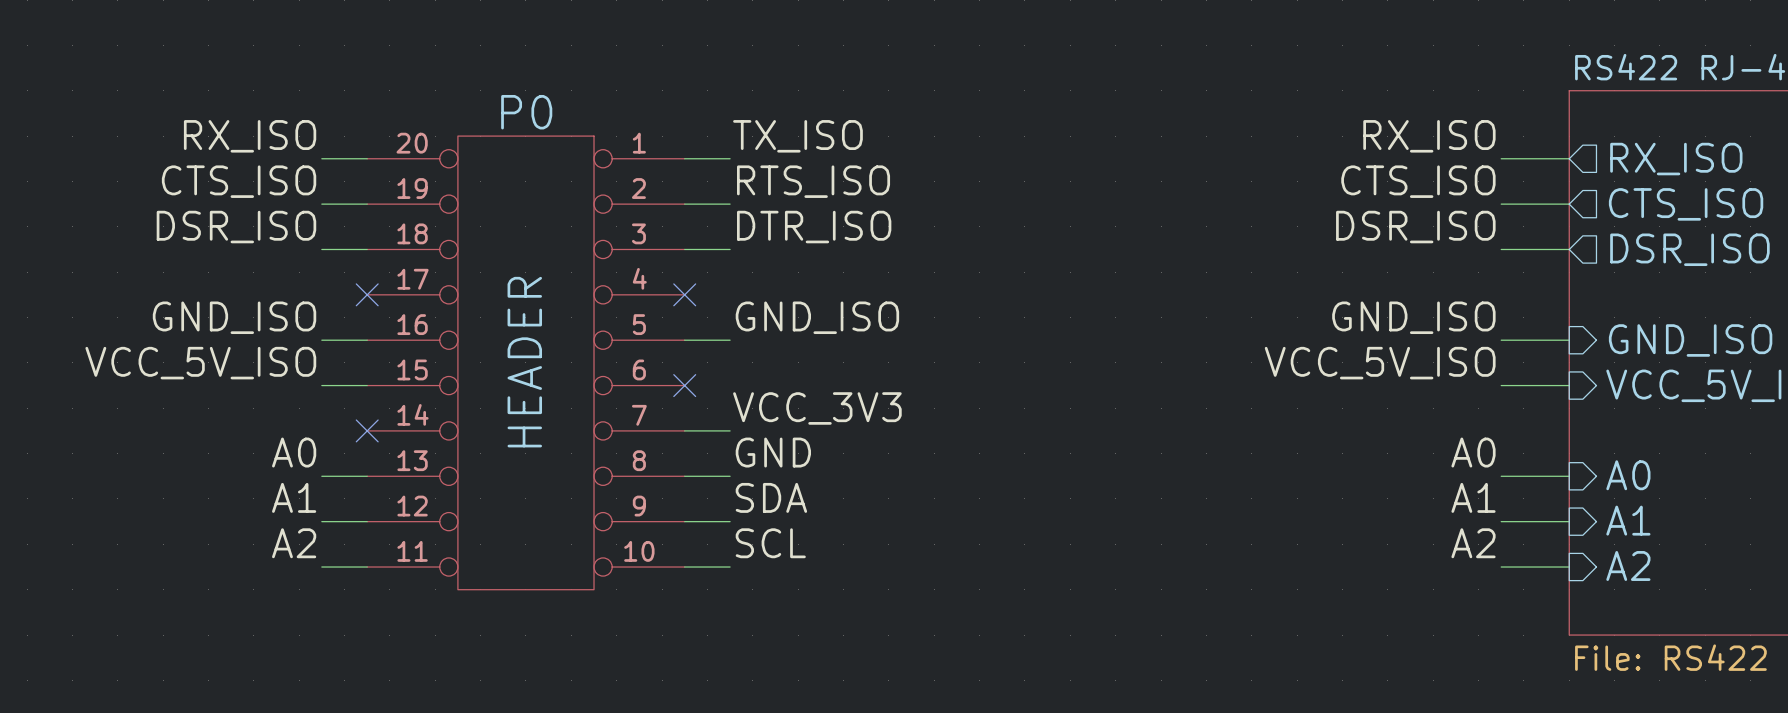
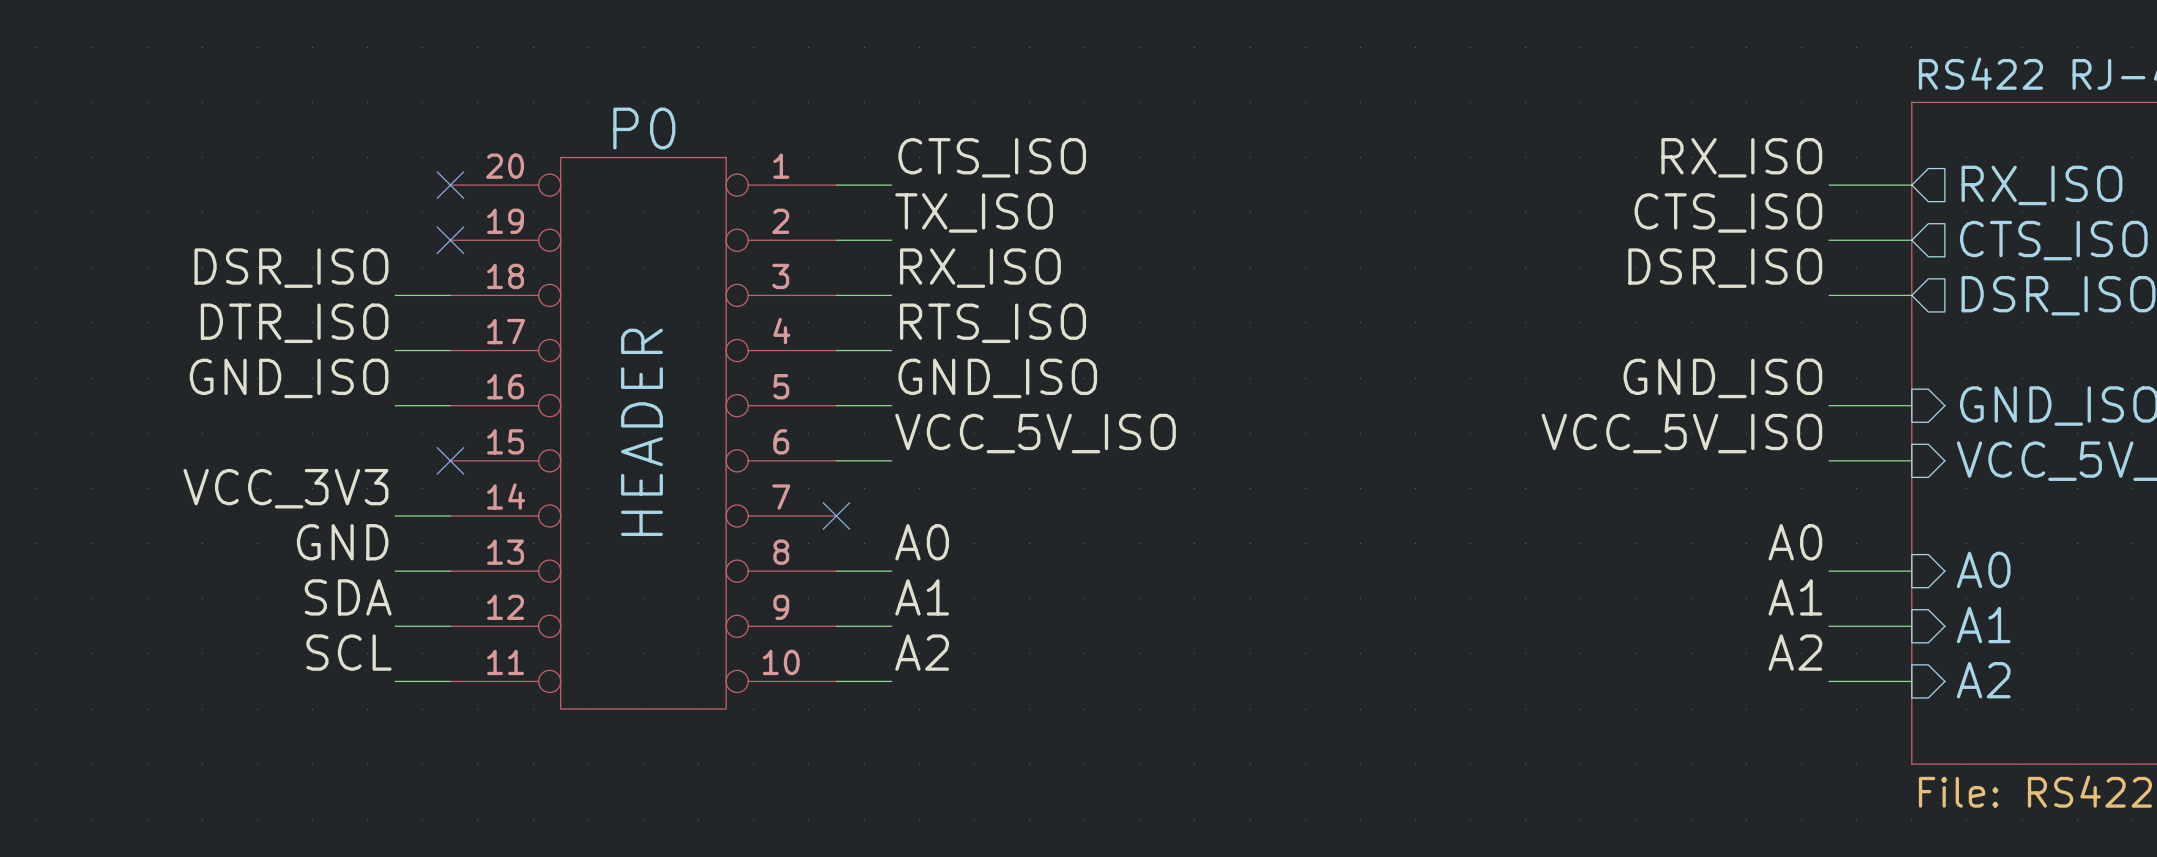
label: RX_ISO (250, 136) -> none
label: TX_ISO (797, 136) -> CTS_ISO (992, 157)
wire: (321, 158) (367, 158) -> (836, 350) (891, 350)
no-connect mark: none -> (450, 185)
label: CTS_ISO (239, 181) -> none
label: RTS_ISO (813, 181) -> TX_ISO (974, 212)
wire: (321, 204) (367, 204) -> (395, 350) (450, 350)
no-connect mark: none -> (450, 240)
label: DTR_ISO (814, 227) -> RX_ISO (980, 268)
label: none -> DTR_ISO (294, 323)
label: none -> RTS_ISO (993, 323)
no-connect mark: (367, 294) -> none
no-connect mark: (684, 294) -> none
label position: VCC_5V_ISO (200, 363) -> VCC_5V_ISO (1035, 433)
wire: (321, 385) (367, 385) -> (395, 515) (450, 515)
no-connect mark: none -> (450, 460)
no-connect mark position: (684, 385) -> (836, 515)
label position: VCC_3V3 (817, 408) -> VCC_3V3 (285, 488)
no-connect mark: (367, 430) -> none
wire: (684, 430) (730, 430) -> (836, 460) (891, 460)
label: A0 (294, 452) -> GND (342, 542)
label: GND (773, 452) -> A0 (922, 542)
label: A1 (294, 497) -> SDA (348, 597)
label: SDA (771, 497) -> A1 (922, 597)
label: A2 (294, 543) -> SCL (348, 652)
label: SCL (770, 543) -> A2 (922, 652)

